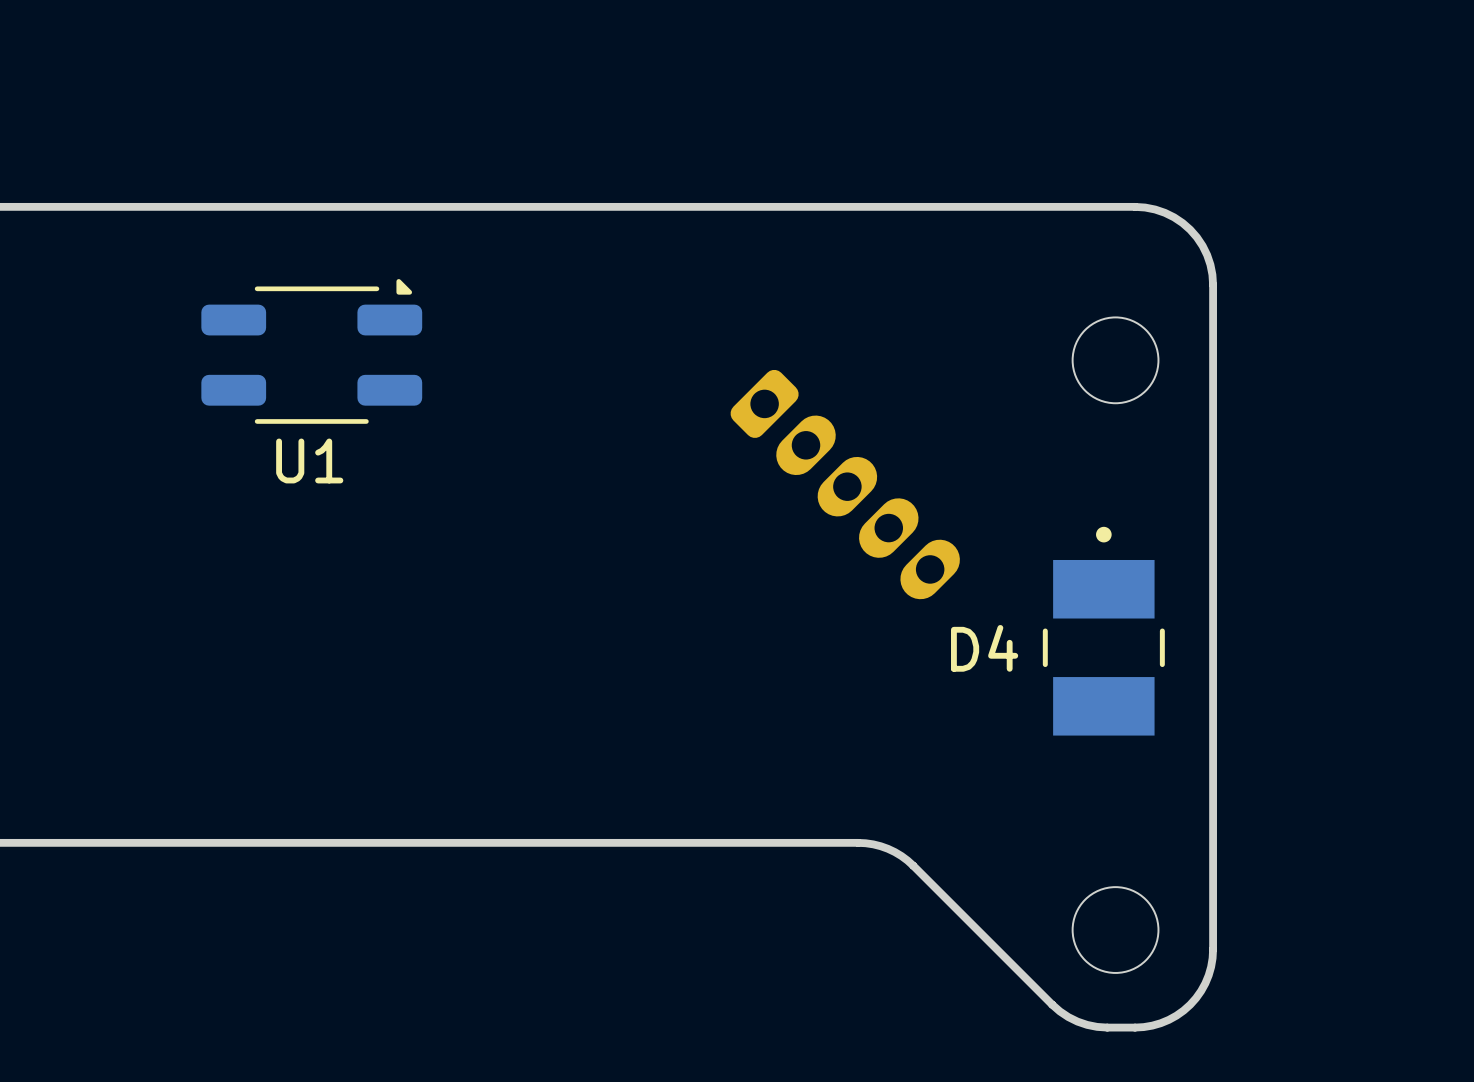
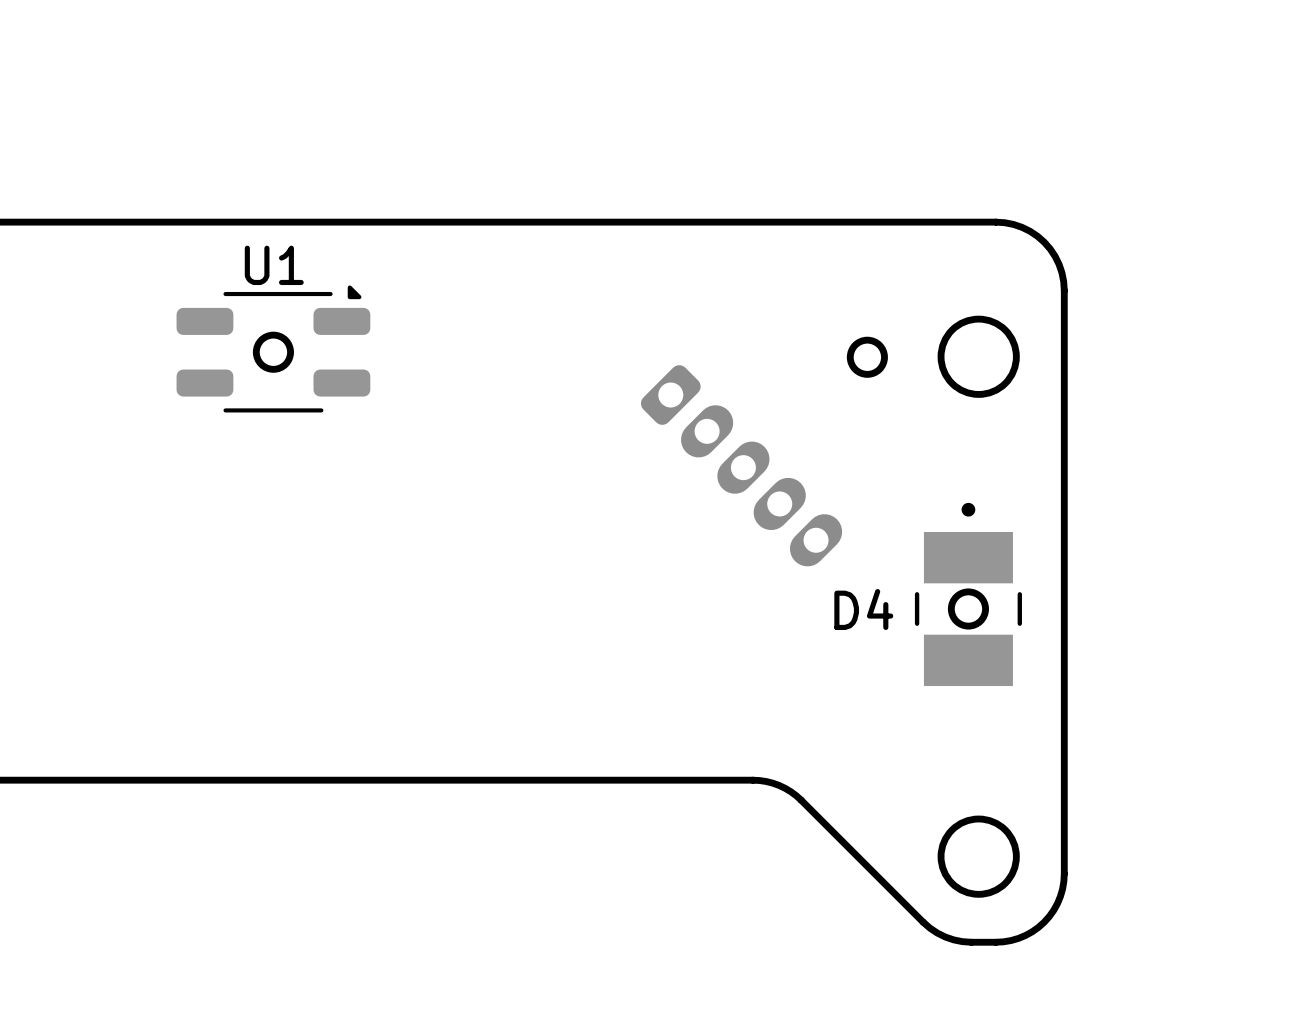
round board edge: none -> [937, 315, 1020, 398]
round board edge: none -> [252, 331, 294, 373]
round board edge: none -> [846, 336, 888, 378]
U1 name position: U1 (309, 460) -> U1 (274, 265)
round board edge: none -> [947, 588, 989, 630]
round board edge: none -> [937, 815, 1020, 898]

